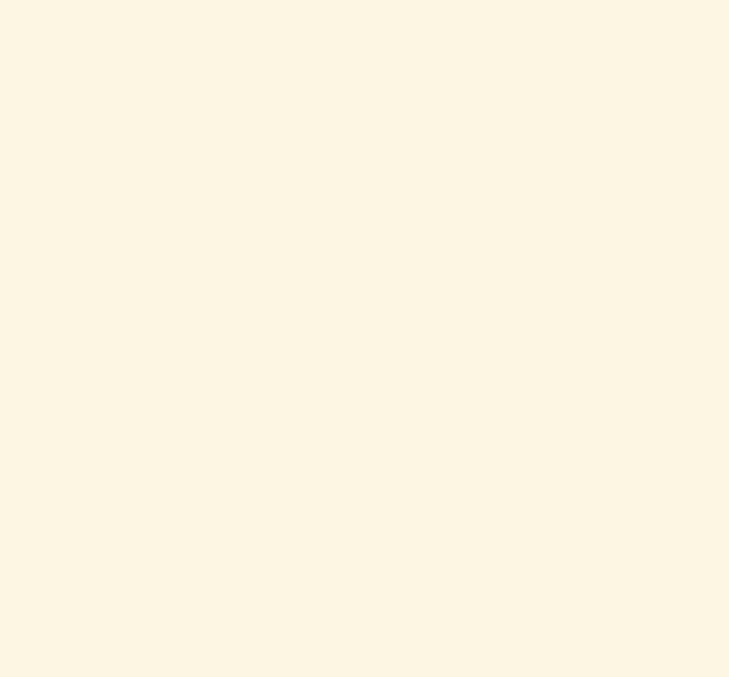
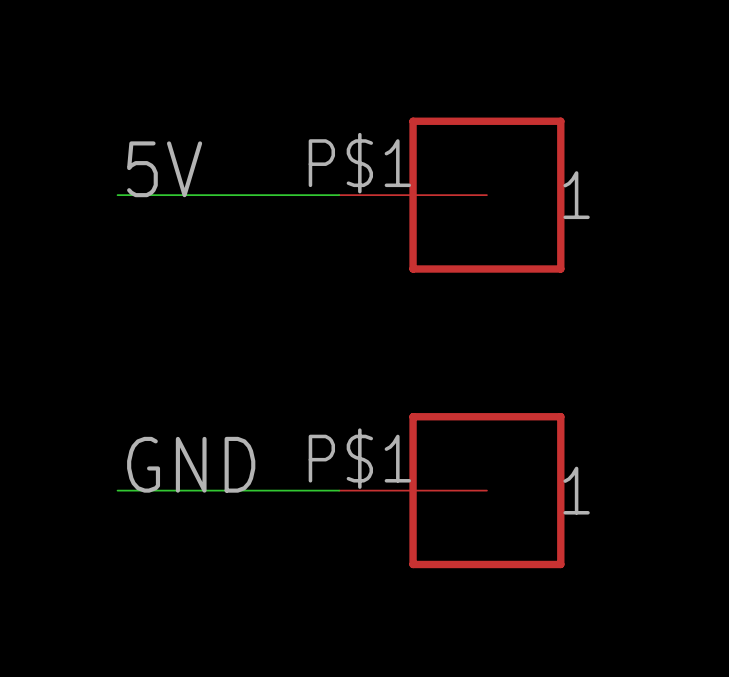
label: none -> 5V (164, 169)
wire: none -> (117, 195) (339, 195)
part: none -> (451, 195)
label: none -> GND (191, 464)
wire: none -> (117, 490) (339, 490)
part: none -> (451, 490)

